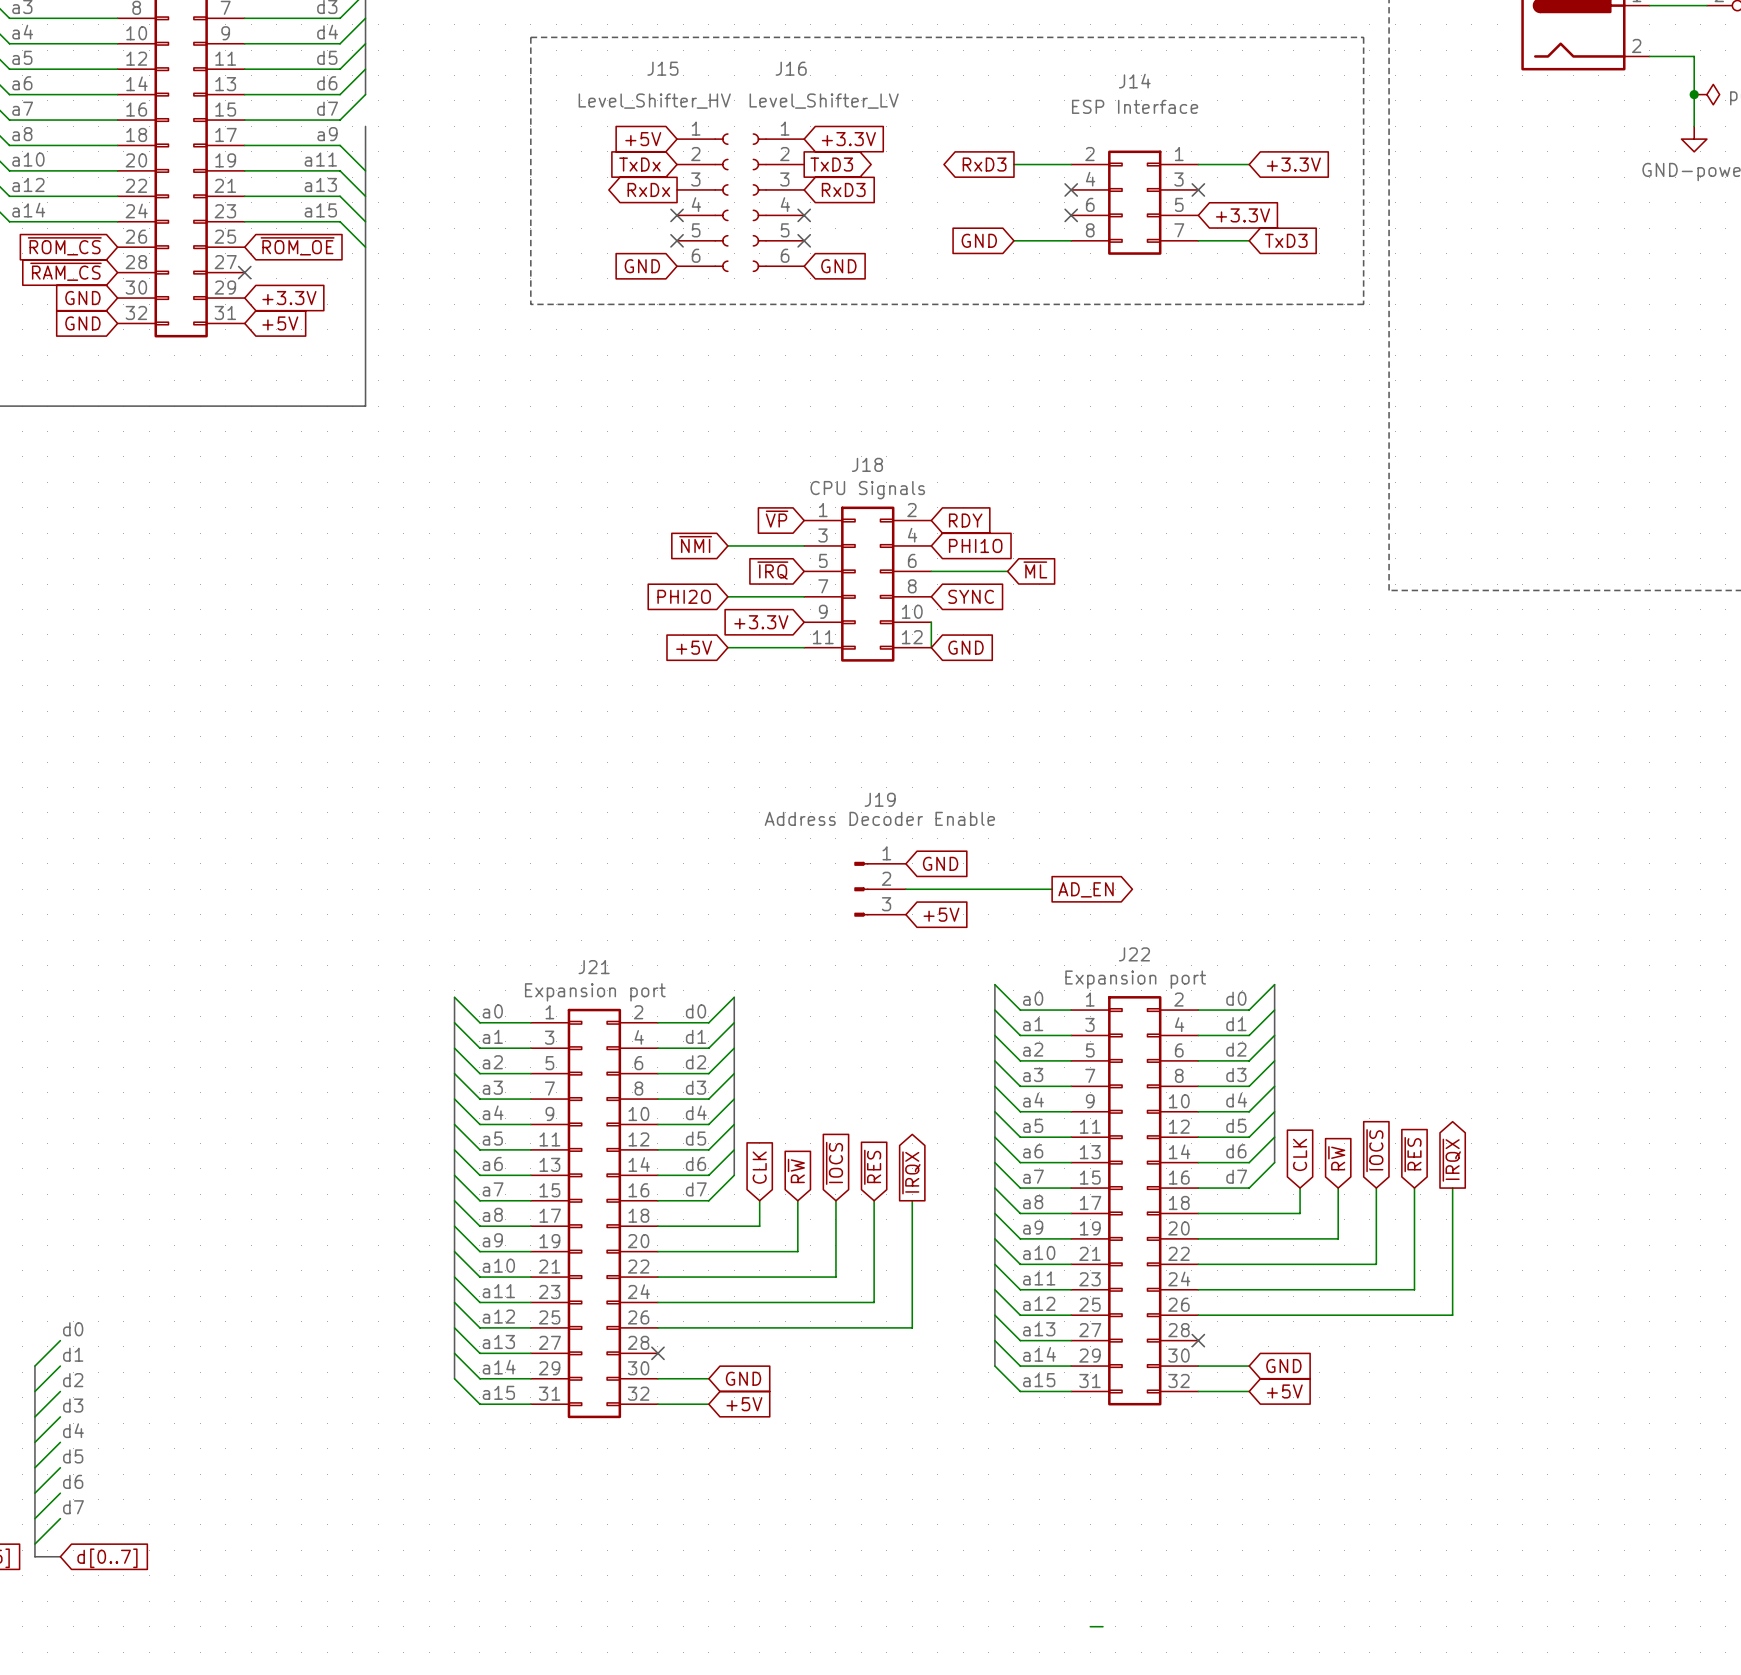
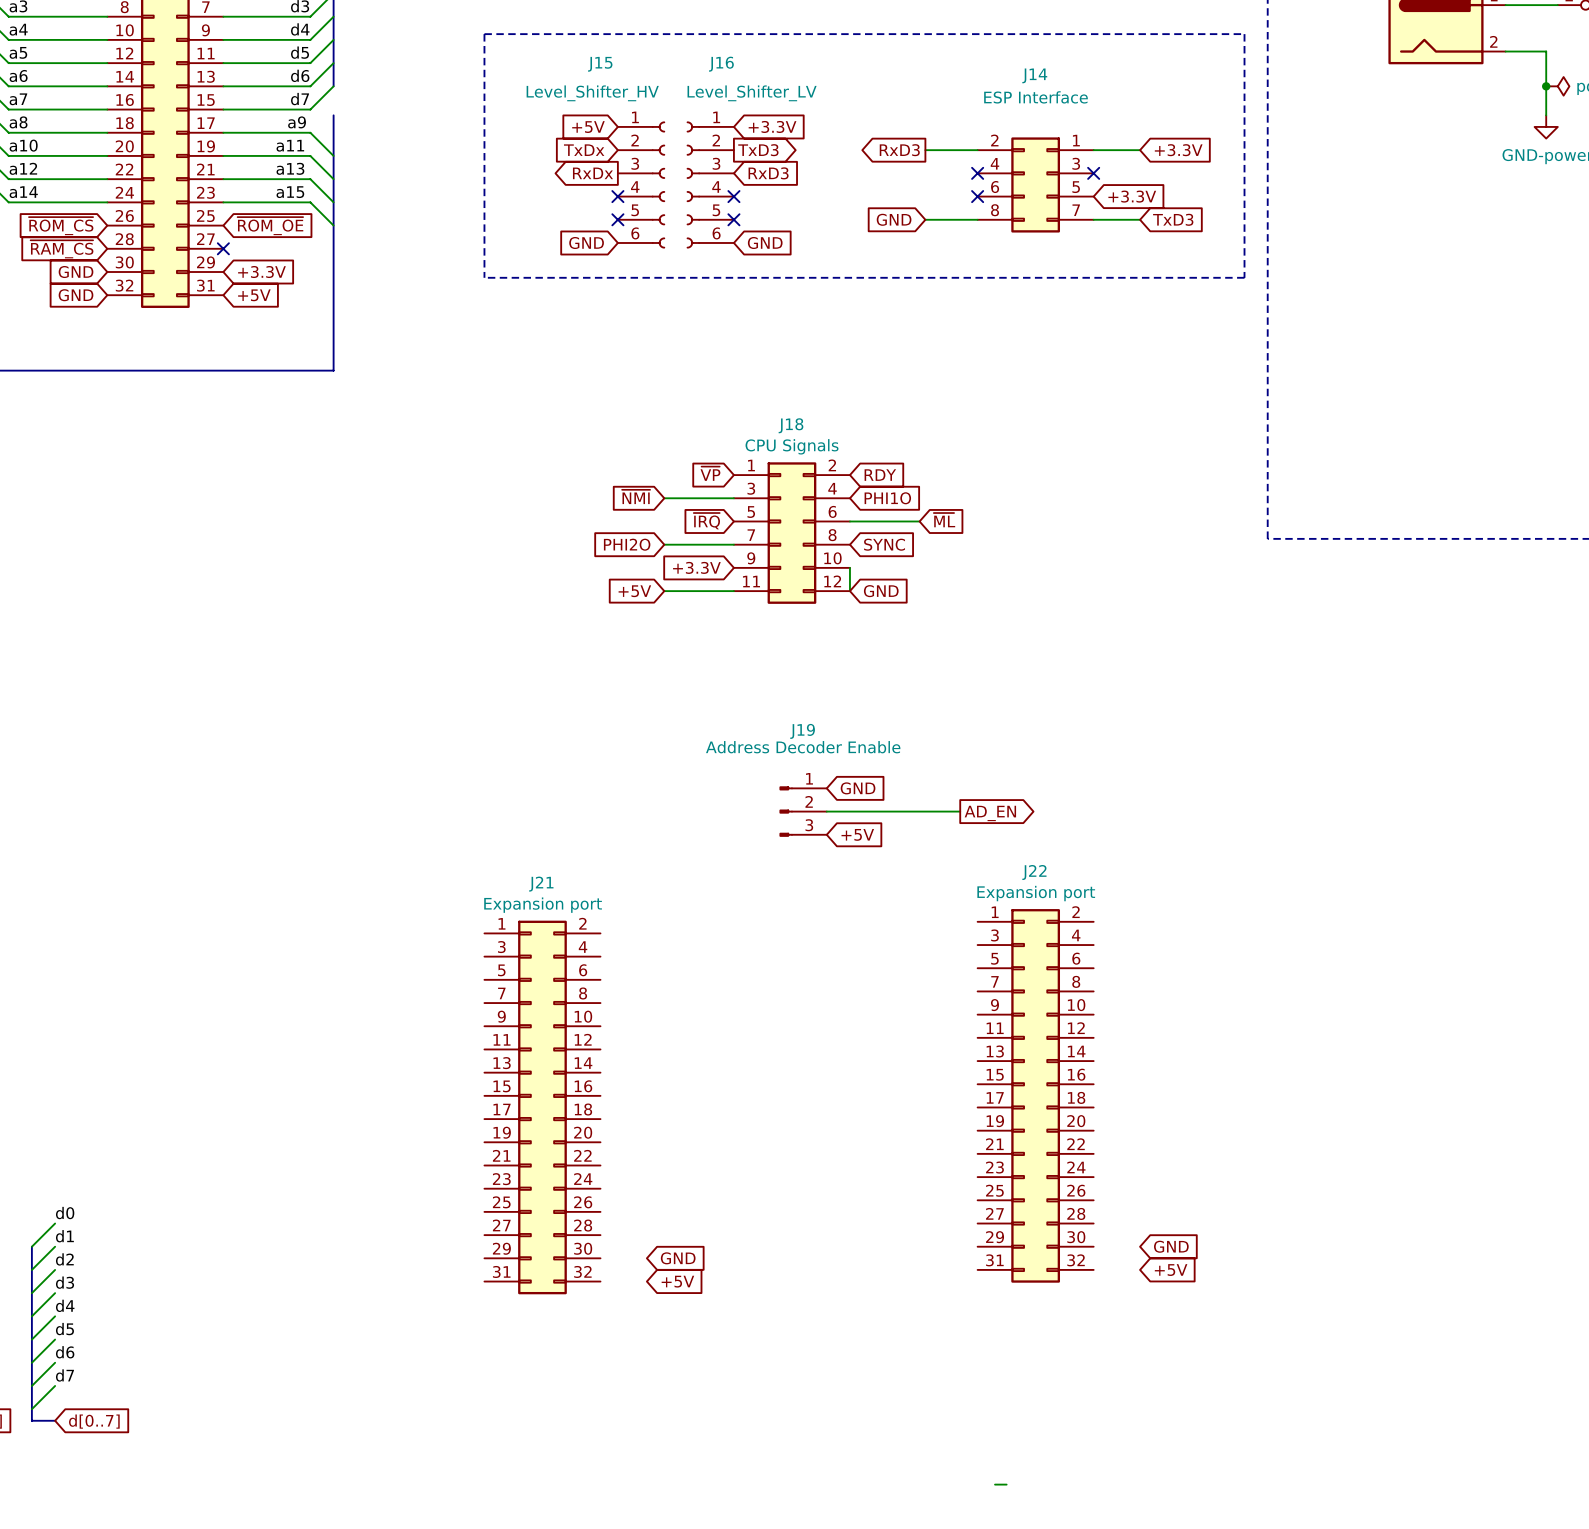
wire: (994, 984) (1020, 1010) (1071, 1010) -> none
bus: (994, 984) (994, 1366) -> none
wire: (1274, 984) (1249, 1010) (1198, 1010) -> none
bus: (1274, 984) (1274, 1162) -> none
wire: (454, 997) (479, 1022) (530, 1022) -> none
bus: (454, 997) (454, 1378) -> none
wire: (734, 997) (708, 1022) (657, 1022) -> none
bus: (734, 997) (734, 1175) -> none
label: a0 (1033, 998) -> none
label: d0 (1236, 998) -> none
wire: (994, 1010) (1020, 1035) (1071, 1035) -> none
wire: (1274, 1010) (1249, 1035) (1198, 1035) -> none
label: a0 (492, 1011) -> none
label: d0 (696, 1011) -> none
wire: (454, 1022) (479, 1048) (530, 1048) -> none
wire: (734, 1022) (708, 1048) (657, 1048) -> none
label: a1 (1033, 1024) -> none
label: d1 (1236, 1024) -> none
wire: (994, 1035) (1020, 1060) (1071, 1060) -> none
wire: (1274, 1035) (1249, 1060) (1198, 1060) -> none
label: a1 (492, 1036) -> none
label: d1 (696, 1036) -> none
wire: (454, 1048) (479, 1073) (530, 1073) -> none
wire: (734, 1048) (708, 1073) (657, 1073) -> none
label: a2 (1033, 1049) -> none
label: d2 (1236, 1049) -> none
wire: (994, 1060) (1020, 1086) (1071, 1086) -> none
wire: (1274, 1060) (1249, 1086) (1198, 1086) -> none
label: a2 (492, 1062) -> none
label: d2 (696, 1062) -> none
wire: (454, 1073) (479, 1099) (530, 1099) -> none
wire: (734, 1073) (708, 1099) (657, 1099) -> none
label: a3 (1033, 1074) -> none
label: d3 (1236, 1074) -> none
wire: (994, 1086) (1020, 1111) (1071, 1111) -> none
wire: (1274, 1086) (1249, 1111) (1198, 1111) -> none
label: a3 (492, 1087) -> none
label: d3 (696, 1087) -> none
wire: (454, 1099) (479, 1124) (530, 1124) -> none
wire: (734, 1099) (708, 1124) (657, 1124) -> none
label: a4 (1033, 1100) -> none
label: d4 (1236, 1100) -> none
wire: (994, 1111) (1020, 1137) (1071, 1137) -> none
wire: (1274, 1111) (1249, 1137) (1198, 1137) -> none
label: a4 (493, 1112) -> none
label: d4 (696, 1112) -> none
wire: (454, 1124) (479, 1149) (530, 1149) -> none
wire: (734, 1124) (708, 1149) (657, 1149) -> none
label: a5 (1033, 1125) -> none
label: d5 (1236, 1125) -> none
wire: (994, 1137) (1020, 1162) (1071, 1162) -> none
wire: (1274, 1137) (1249, 1162) (1198, 1162) -> none
label: a5 (492, 1138) -> none
label: d5 (696, 1138) -> none
wire: (454, 1149) (479, 1175) (530, 1175) -> none
wire: (734, 1149) (708, 1175) (657, 1175) -> none
global label: ~{IOCS} (1374, 1150) -> none
label: a6 (1033, 1151) -> none
label: d6 (1236, 1151) -> none
global label: CLK (1300, 1154) -> none
global label: ~{RES} (1413, 1154) -> none
global label: R~{W} (1336, 1158) -> none
global label: ~{IRQX} (1451, 1160) -> none
wire: (994, 1162) (1020, 1188) (1071, 1188) -> none
wire: (1274, 1162) (1249, 1188) (1198, 1188) -> none
label: a6 (492, 1163) -> none
label: d6 (696, 1163) -> none
global label: ~{IOCS} (834, 1163) -> none
global label: CLK (759, 1167) -> none
global label: ~{RES} (872, 1167) -> none
global label: R~{W} (796, 1170) -> none
global label: ~{IRQX} (911, 1172) -> none
wire: (454, 1175) (479, 1200) (530, 1200) -> none
wire: (734, 1175) (708, 1200) (657, 1200) -> none
label: a7 (1033, 1176) -> none
label: d7 (1236, 1176) -> none
wire: (994, 1188) (1020, 1213) (1071, 1213) -> none
wire: (1300, 1188) (1300, 1213) (1198, 1213) -> none
wire: (1338, 1188) (1338, 1238) (1198, 1238) -> none
wire: (1376, 1188) (1376, 1264) (1198, 1264) -> none
wire: (1414, 1188) (1414, 1289) (1198, 1289) -> none
wire: (1452, 1188) (1452, 1315) (1198, 1315) -> none
label: a7 (493, 1189) -> none
label: d7 (696, 1189) -> none
wire: (454, 1200) (479, 1226) (530, 1226) -> none
wire: (759, 1200) (759, 1226) (657, 1226) -> none
wire: (797, 1200) (797, 1251) (657, 1251) -> none
wire: (835, 1200) (835, 1277) (657, 1277) -> none
wire: (874, 1200) (874, 1302) (657, 1302) -> none
wire: (912, 1200) (912, 1327) (657, 1327) -> none
label: a8 (1033, 1202) -> none
wire: (994, 1213) (1020, 1238) (1071, 1238) -> none
label: a8 (492, 1214) -> none
wire: (454, 1226) (479, 1251) (530, 1251) -> none
label: a9 (1033, 1227) -> none
wire: (994, 1238) (1020, 1264) (1071, 1264) -> none
label: a9 (492, 1240) -> none
wire: (454, 1251) (479, 1277) (530, 1277) -> none
label: a10 (1039, 1252) -> none
wire: (994, 1264) (1020, 1289) (1071, 1289) -> none
label: a10 (498, 1265) -> none
wire: (454, 1277) (479, 1302) (530, 1302) -> none
label: a11 (1039, 1278) -> none
wire: (994, 1289) (1020, 1315) (1071, 1315) -> none
label: a11 (498, 1291) -> none
wire: (454, 1302) (479, 1327) (530, 1327) -> none
label: a12 (1039, 1303) -> none
wire: (994, 1315) (1020, 1340) (1071, 1340) -> none
label: a12 (498, 1316) -> none
wire: (454, 1327) (479, 1353) (530, 1353) -> none
label: a13 (1039, 1329) -> none
wire: (994, 1340) (1020, 1366) (1071, 1366) -> none
no-connect mark: (1198, 1340) -> none
label: a13 (498, 1341) -> none
wire: (454, 1353) (479, 1378) (530, 1378) -> none
no-connect mark: (657, 1353) -> none
label: a14 (1039, 1354) -> none
wire: (994, 1366) (1020, 1391) (1071, 1391) -> none
wire: (1198, 1366) (1249, 1366) -> none
label: a14 (499, 1367) -> none
wire: (454, 1378) (479, 1404) (530, 1404) -> none
wire: (657, 1378) (708, 1378) -> none
label: a15 (1039, 1380) -> none
wire: (1198, 1391) (1249, 1391) -> none
label: a15 (498, 1392) -> none
wire: (657, 1404) (708, 1404) -> none

